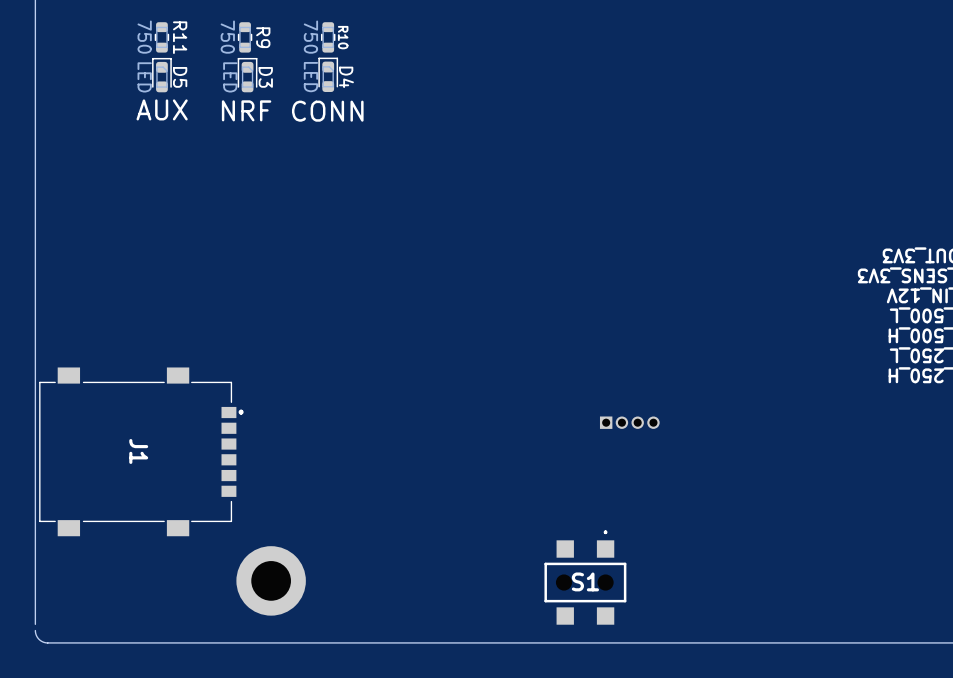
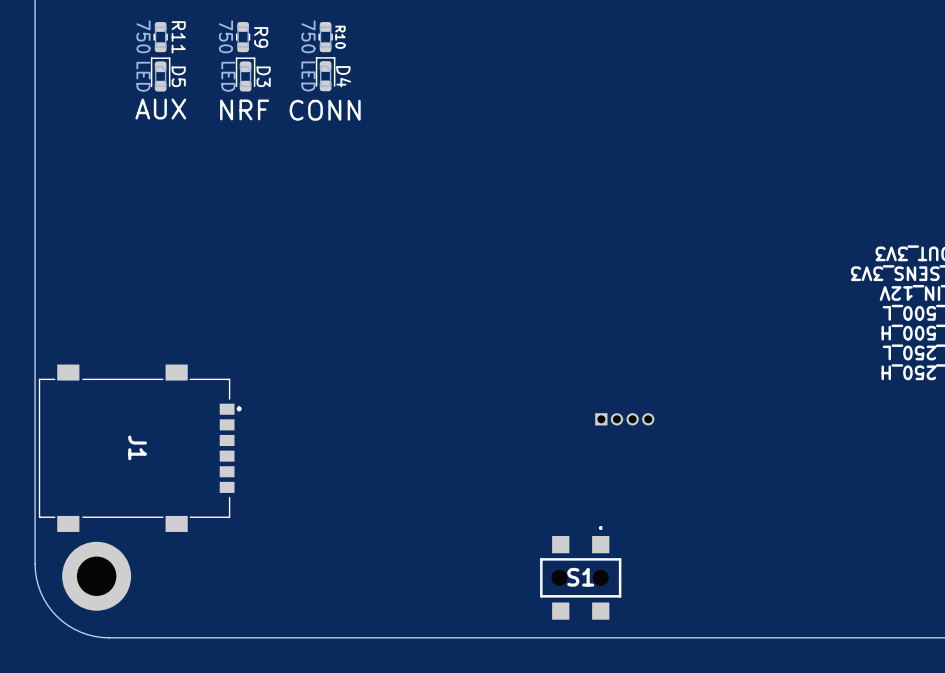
board edge: (35, 568) (35, 624) -> none
part position: (271, 580) -> (96, 576)
board edge: (35, 630) (39, 639) (46, 642) (109, 642) -> (35, 563) (40, 592) (56, 616) (80, 632) (108, 637)

